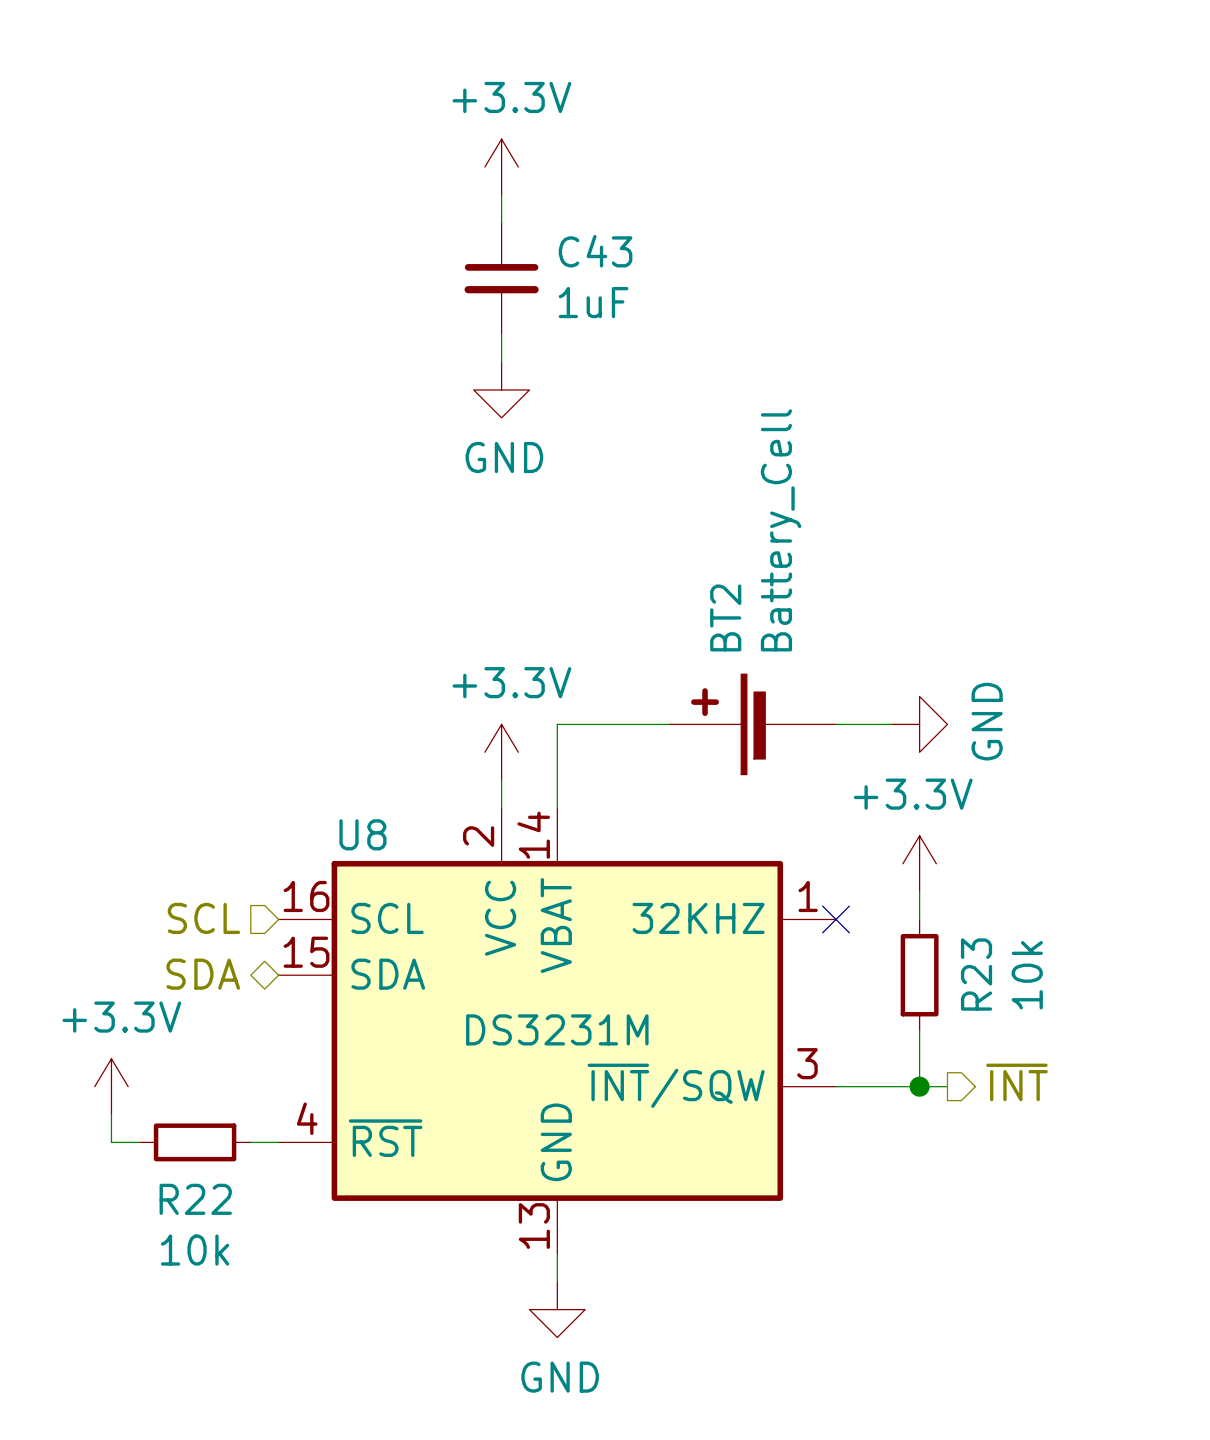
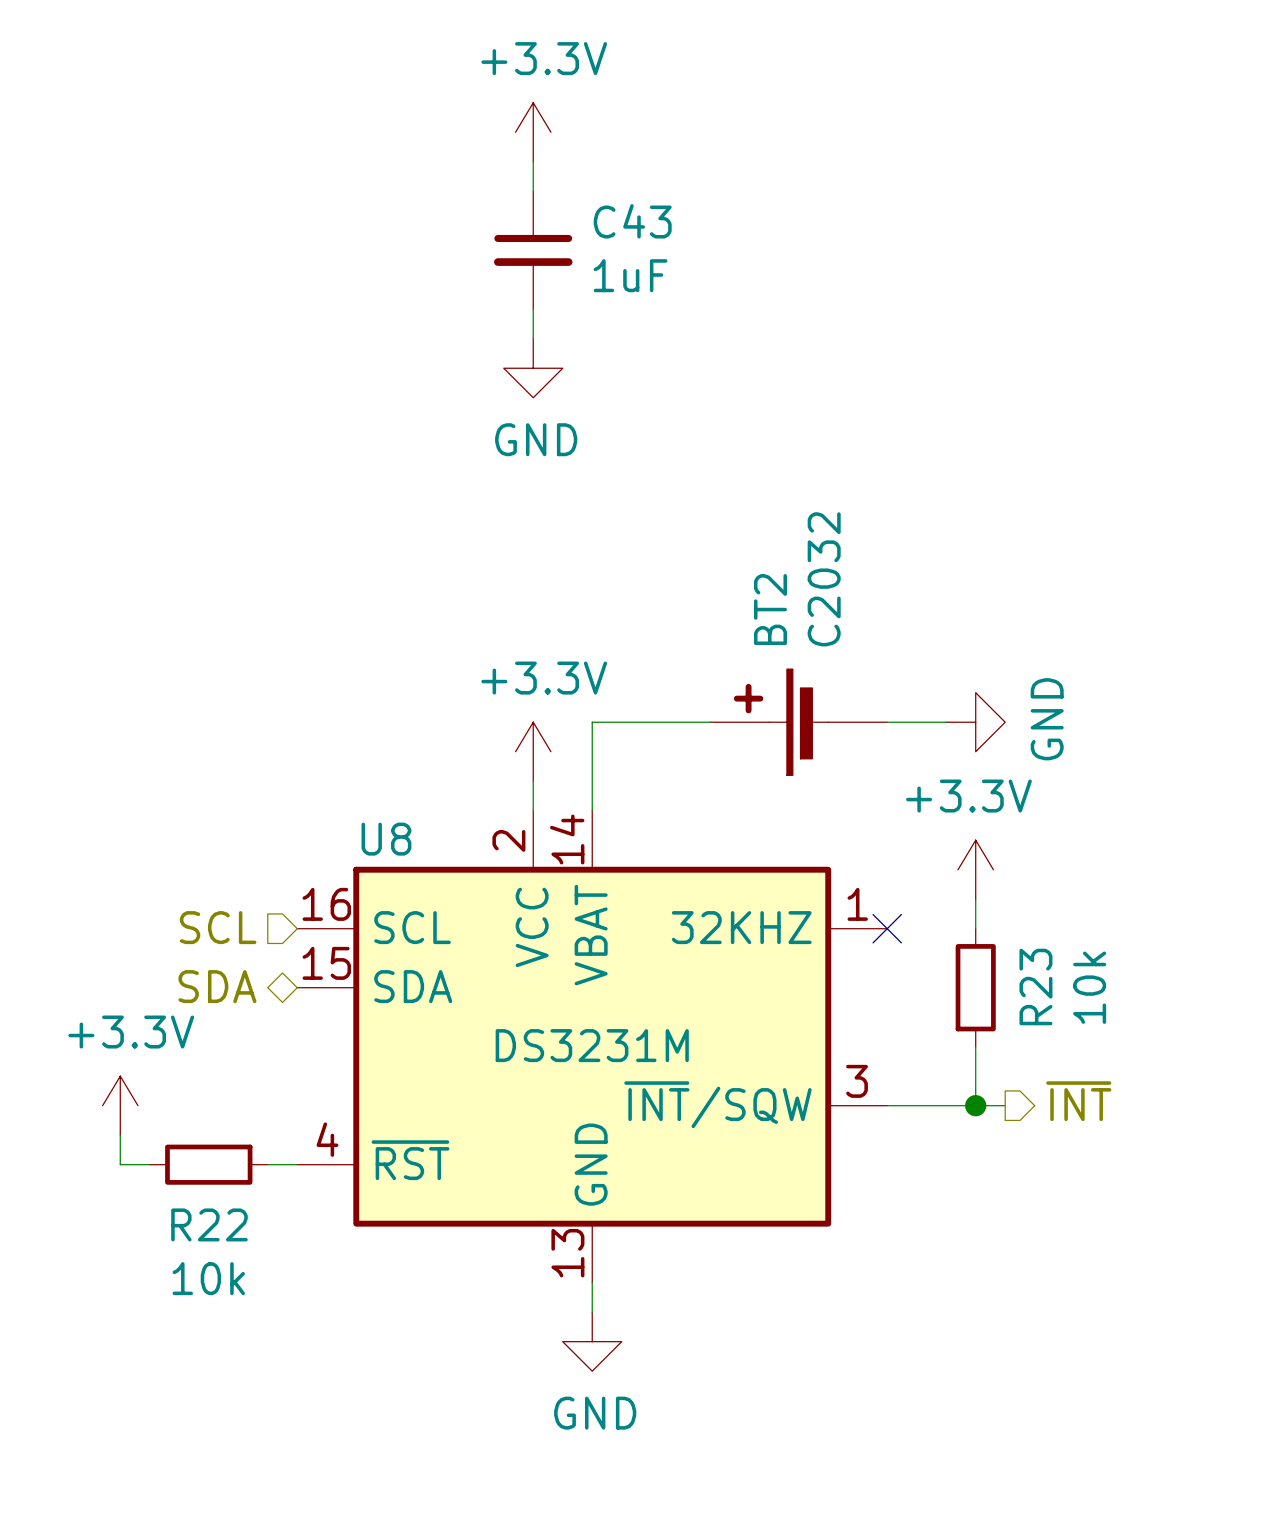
BT2 value: Battery_Cell (781, 530) -> C2032 (824, 579)

